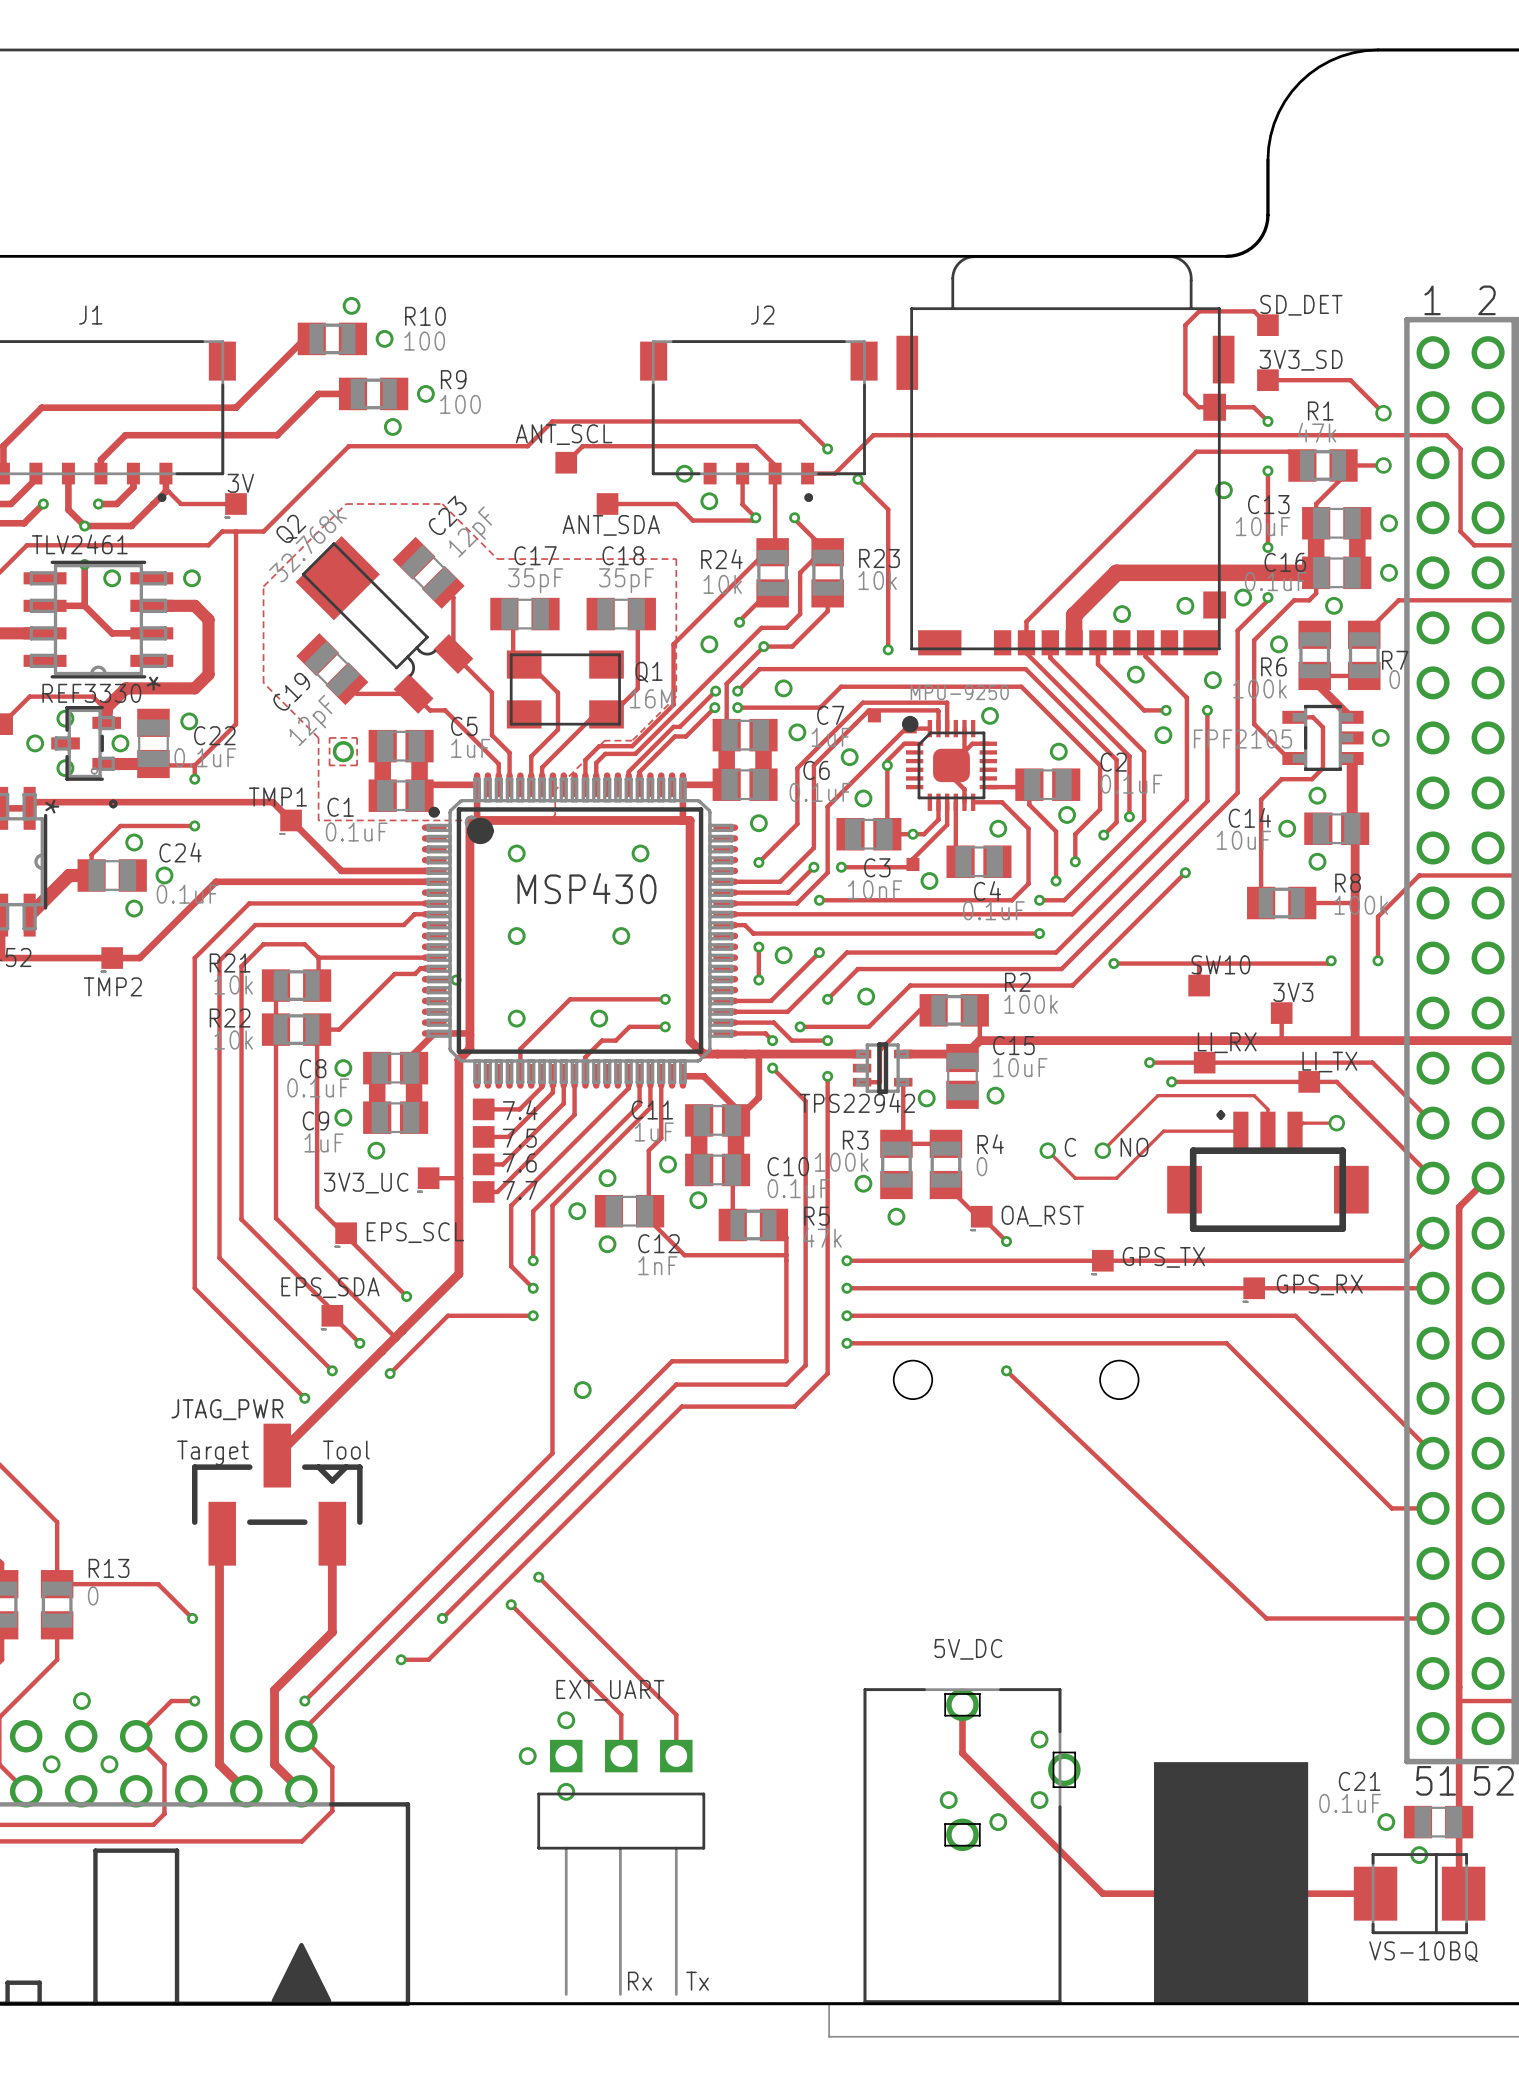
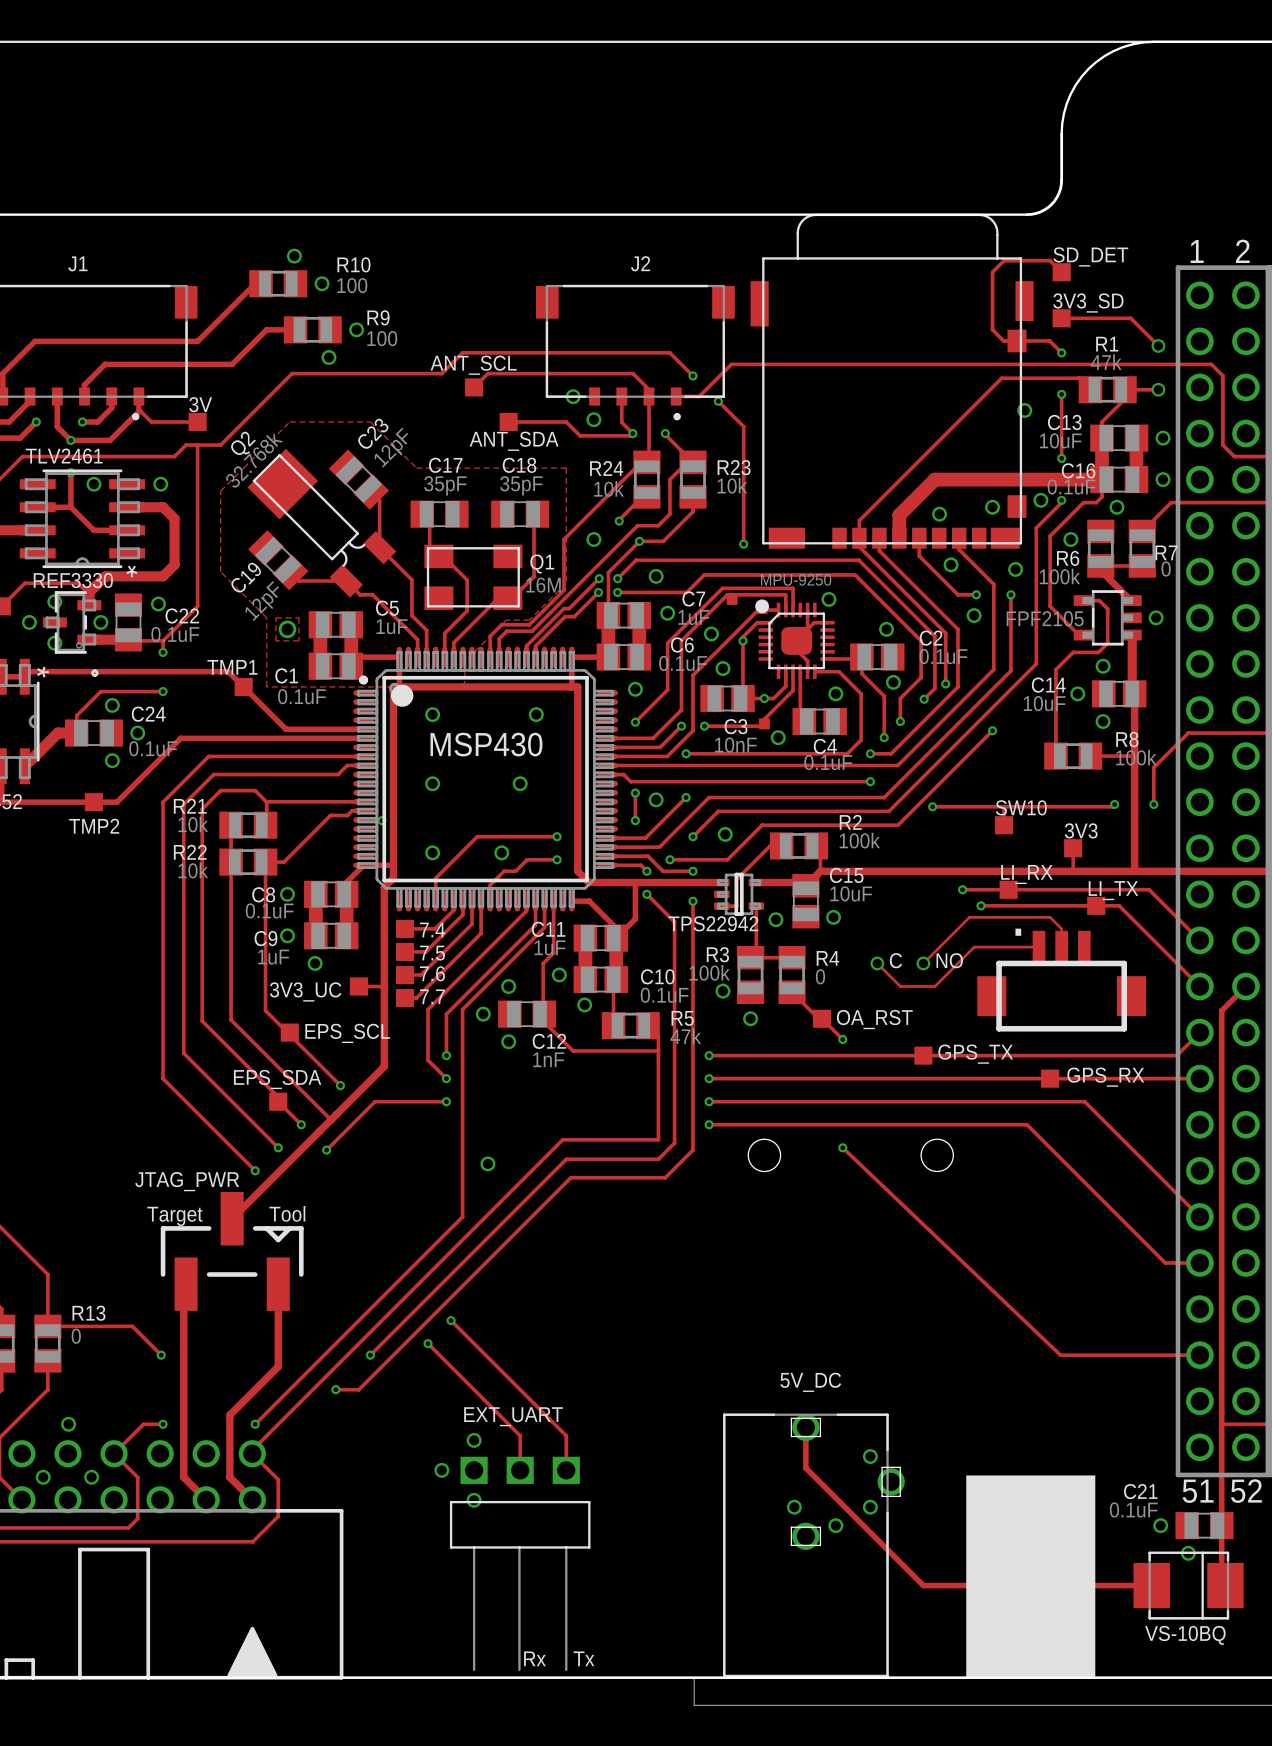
track: (1336, 1123) (1303, 1123) (1295, 1131) -> none
via: (1336, 1123) -> none

